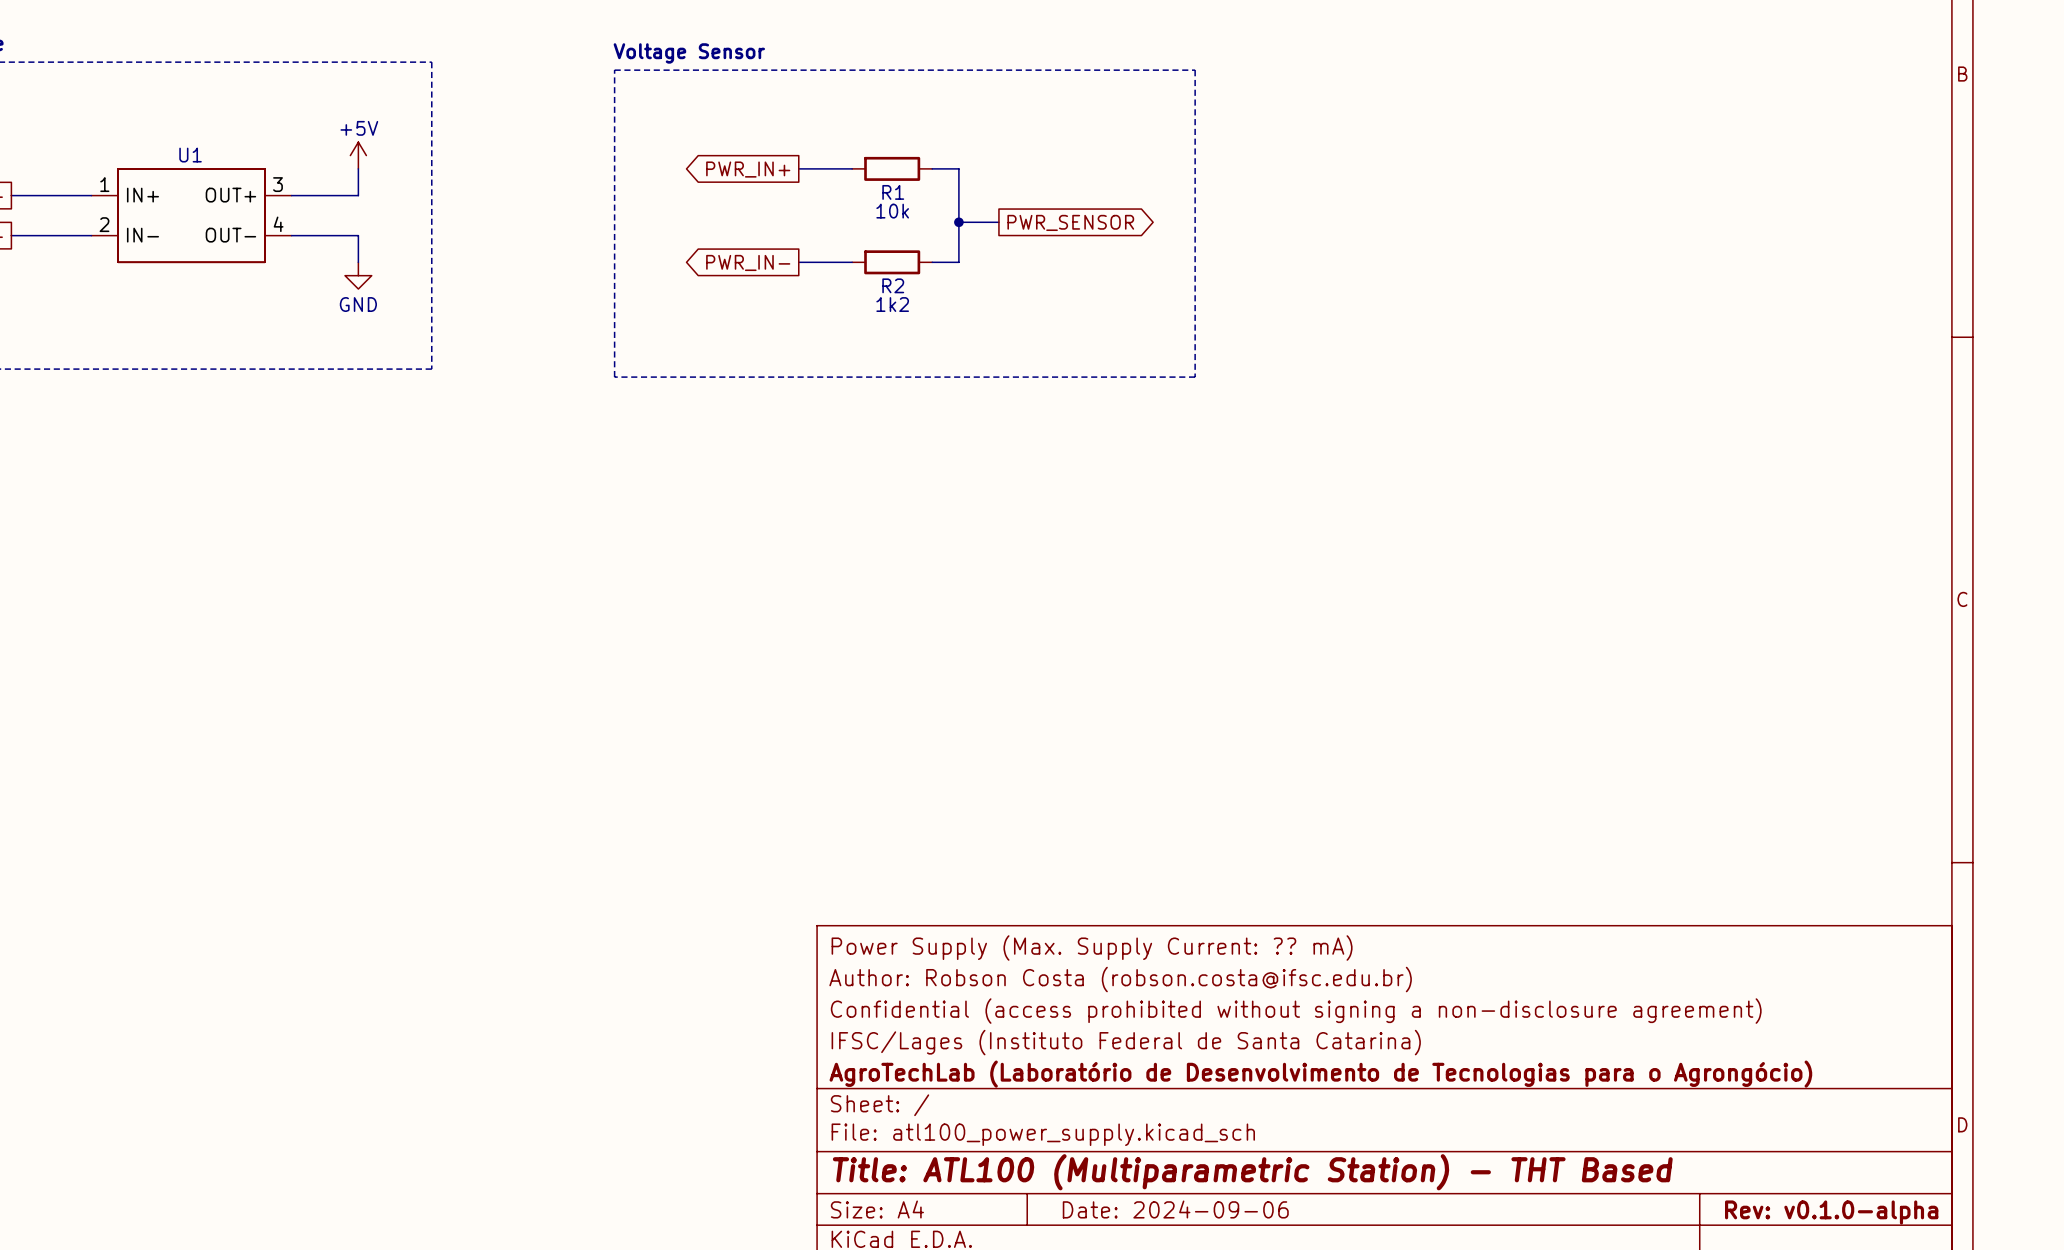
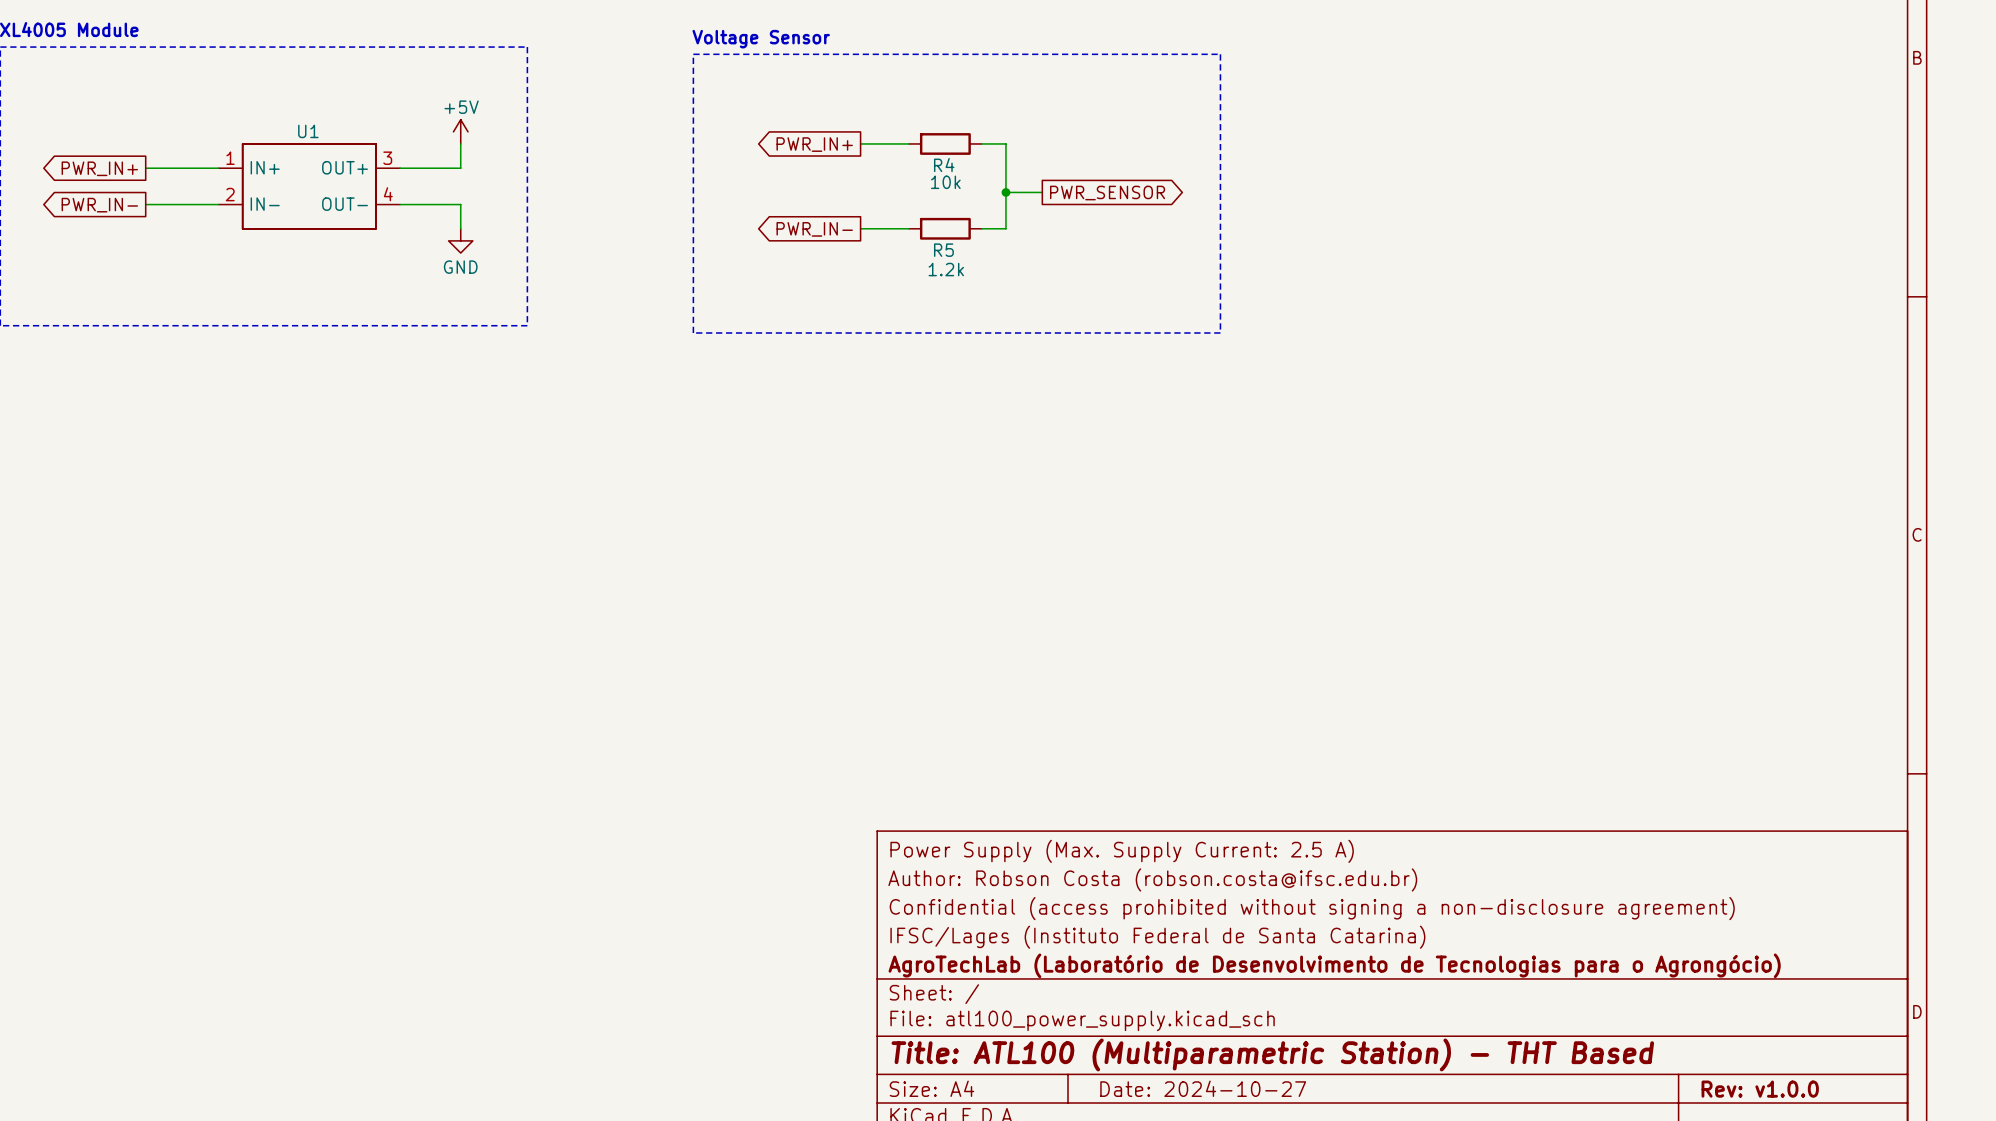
R1 name: R1 (893, 192) -> R4 (944, 165)
R2 name: R2 (893, 285) -> R5 (943, 250)
R2 value: 1k2 (892, 304) -> 1.2k (946, 269)
title block: Power Supply (Max. Supply Current: ?? mA) (1092, 948) -> Power Supply (Max. Supply Current: 2.5 A) (1122, 851)
title block: Date: 2024-09-06 (1175, 1209) -> Date: 2024-10-27 (1203, 1088)
title block: Rev: v0.1.0-alpha (1831, 1212) -> Rev: v1.0.0 (1760, 1089)

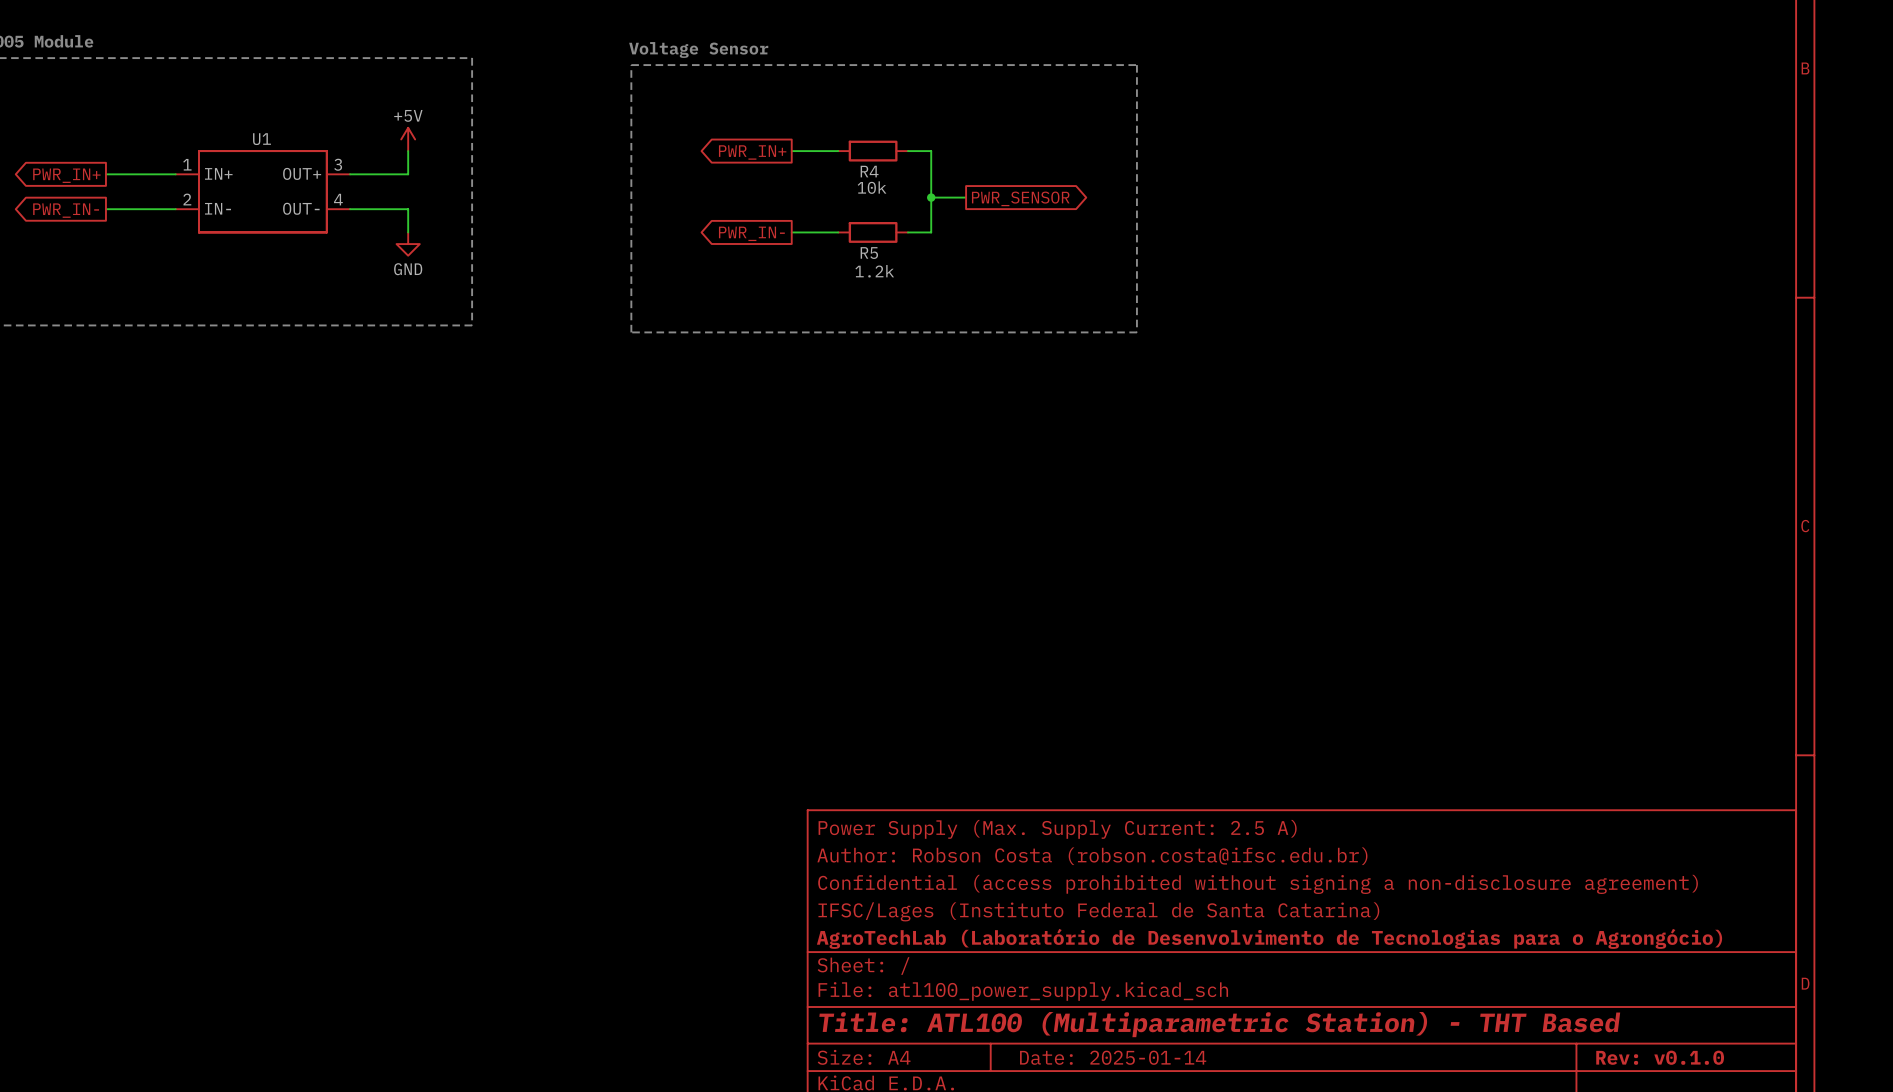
title block: Date: 2024-10-27 (1203, 1088) -> Date: 2025-01-14 (1113, 1057)
title block: Rev: v1.0.0 (1760, 1089) -> Rev: v0.1.0 (1660, 1057)

